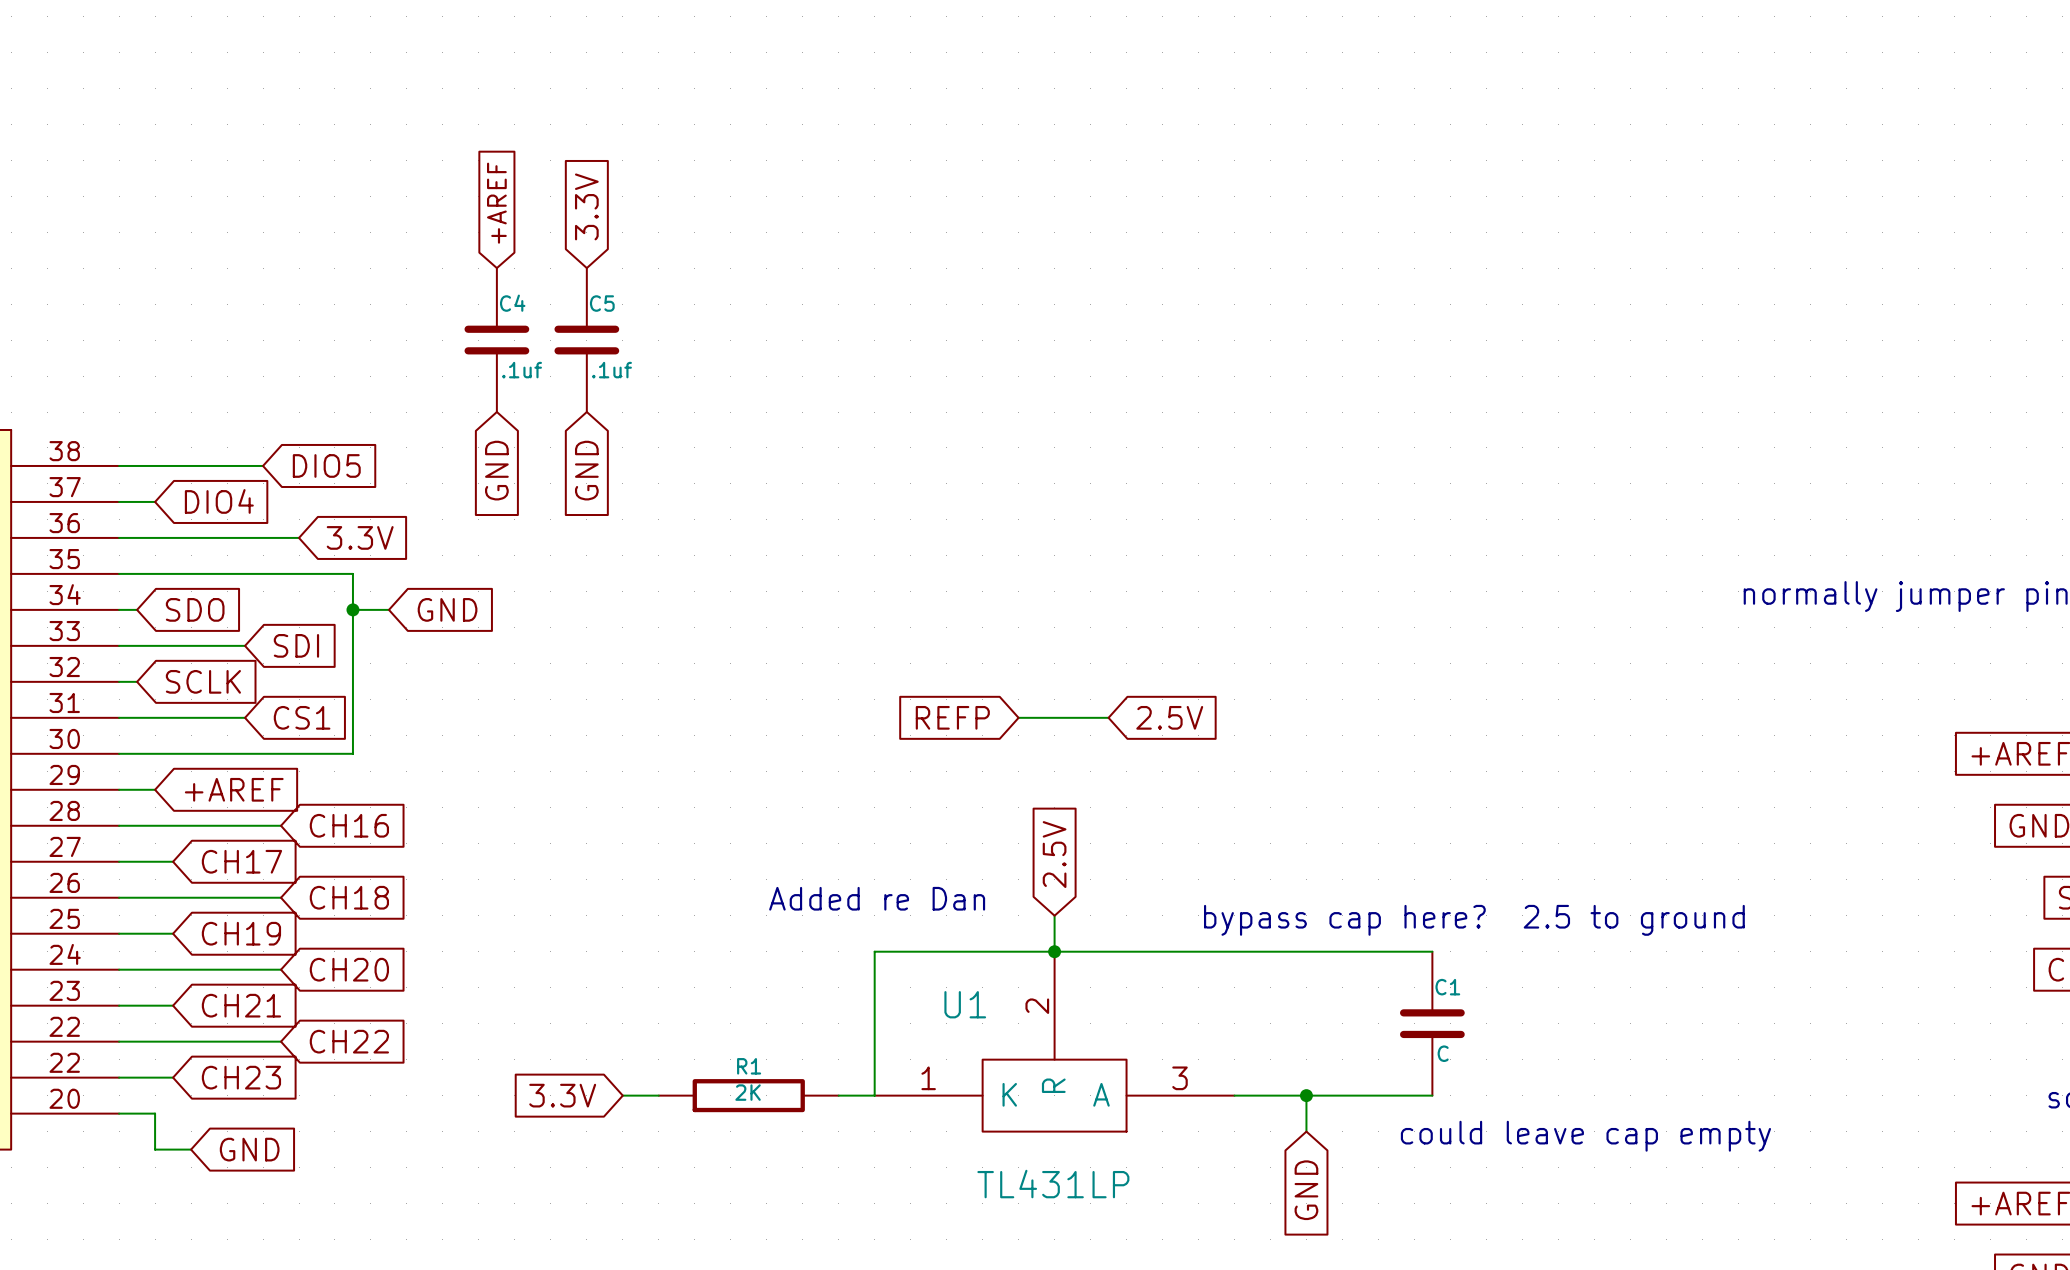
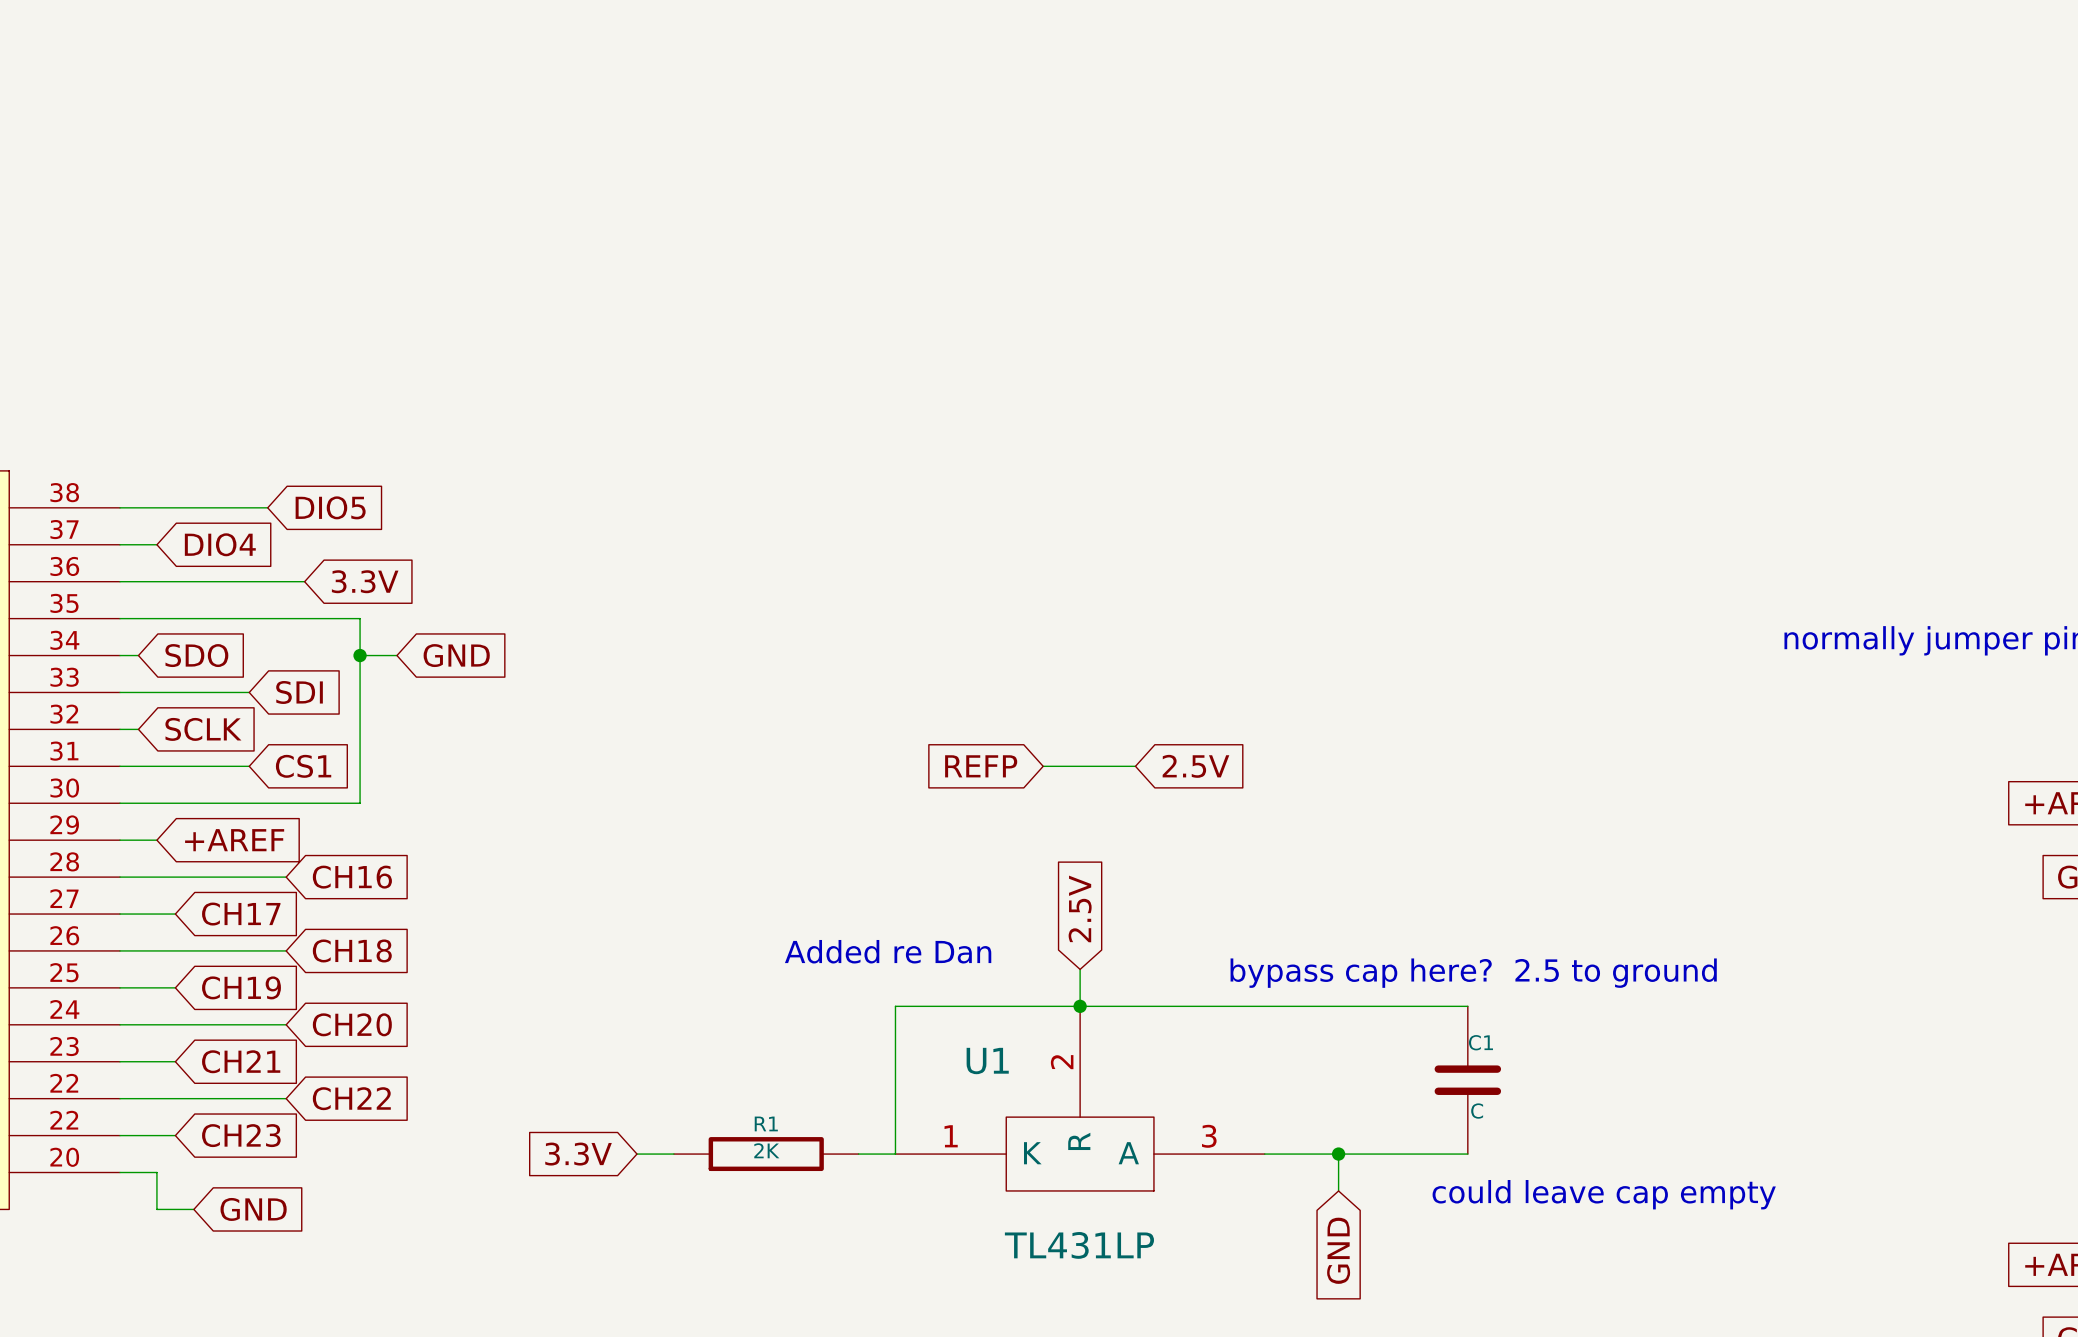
global label: +AREF (496, 203) -> none
global label: 3.3V (586, 206) -> none
C4: .1uf (496, 340) -> none
C5: .1uf (586, 340) -> none
global label: GND (496, 470) -> none
global label: GND (586, 470) -> none

